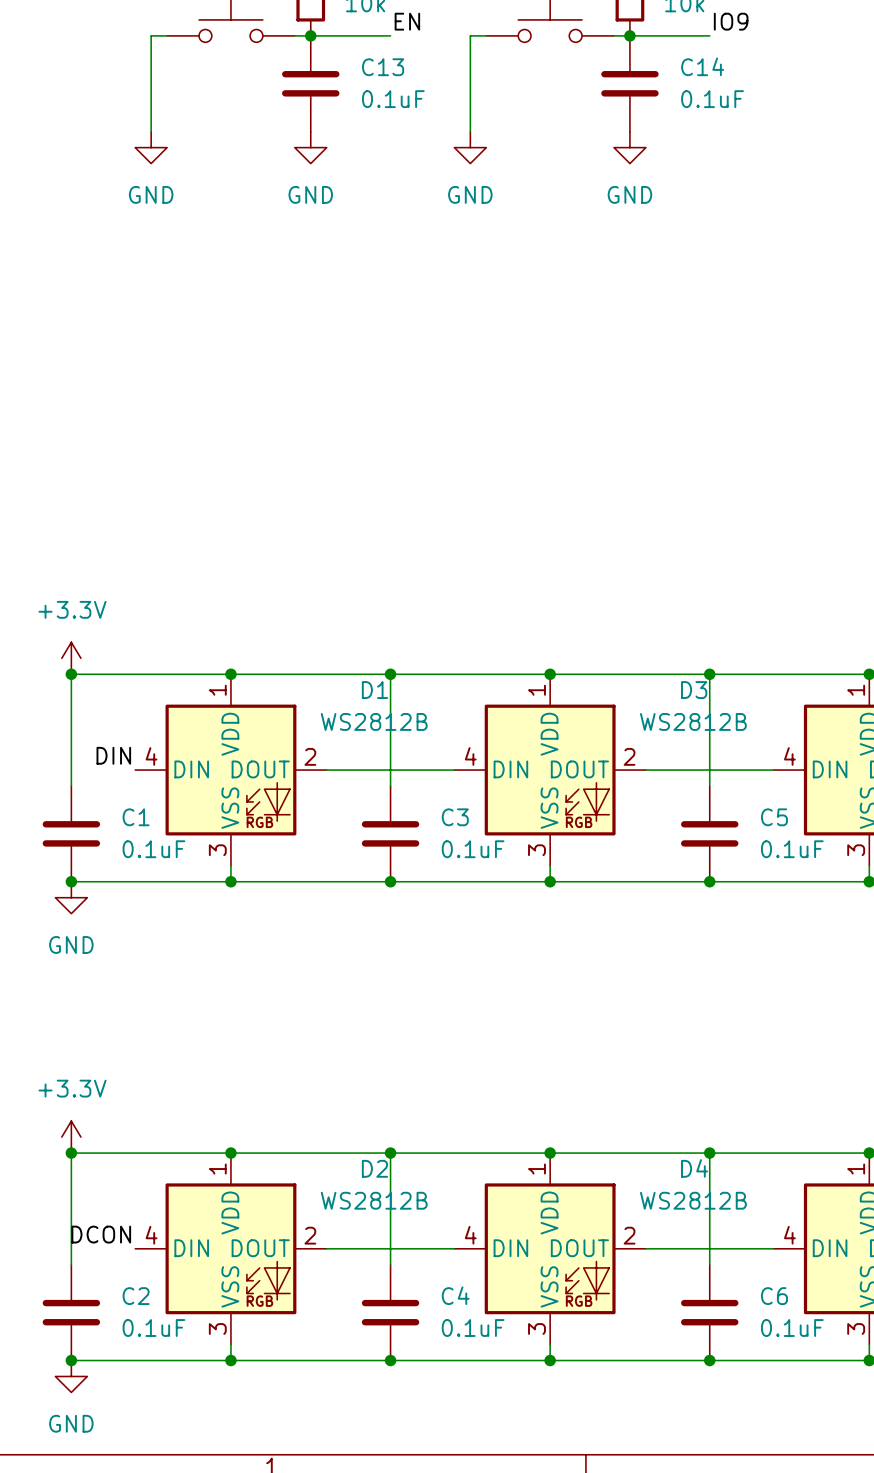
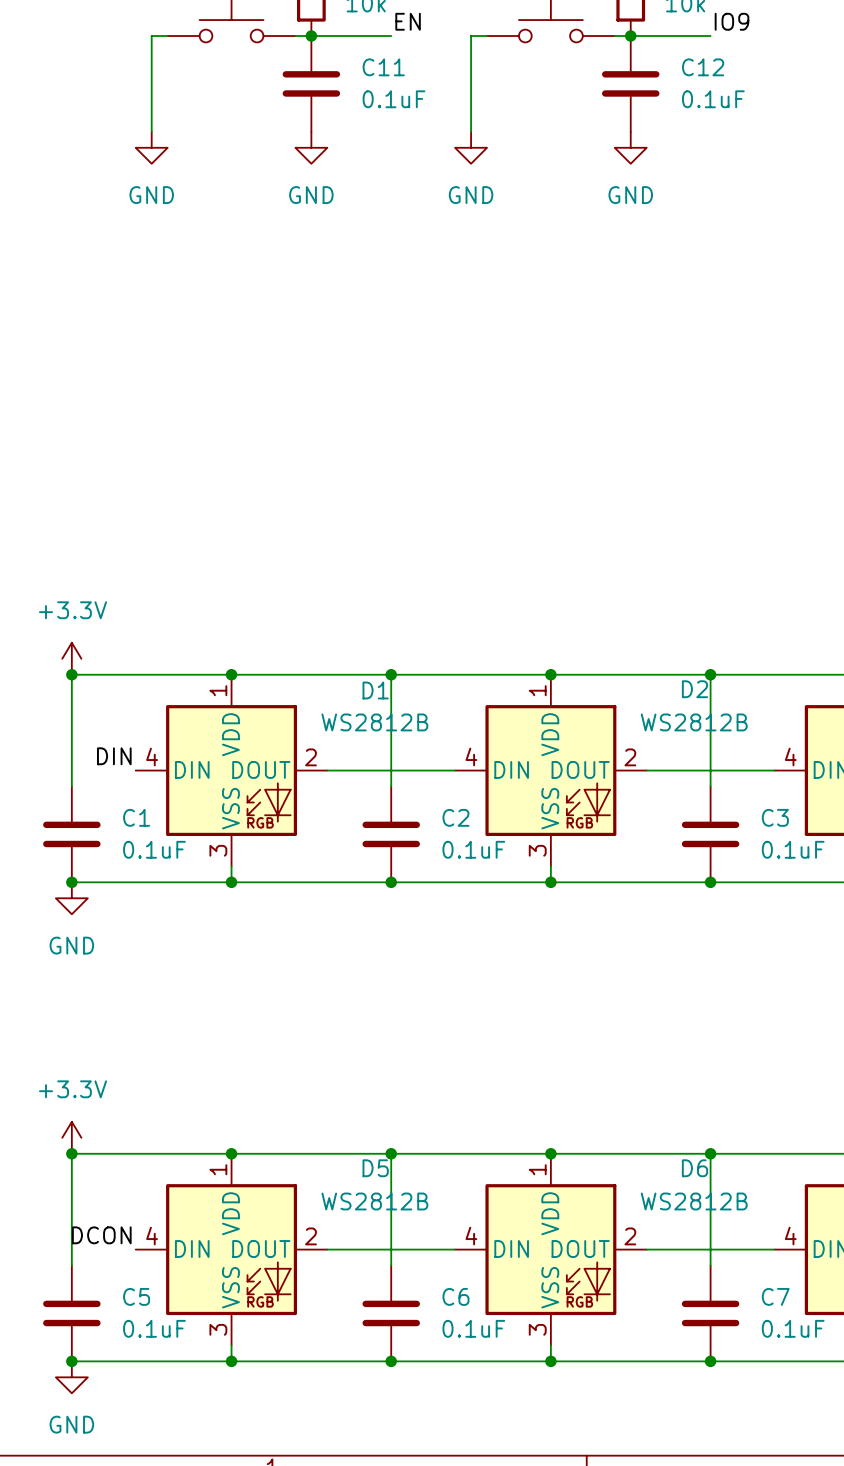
C14 name: C14 (702, 66) -> C12 (703, 67)
C13 name: C13 (383, 67) -> C11 (383, 67)
D3 name: D3 (694, 690) -> D2 (694, 689)
C3 name: C3 (455, 817) -> C2 (455, 817)
C5 name: C5 (774, 817) -> C3 (775, 817)
D2 name: D2 (374, 1168) -> D5 (375, 1168)
D4 name: D4 (694, 1168) -> D6 (694, 1168)
C4 name: C4 (455, 1295) -> C6 (455, 1296)
C2 name: C2 (136, 1296) -> C5 (136, 1296)
C6 name: C6 (774, 1296) -> C7 (775, 1296)

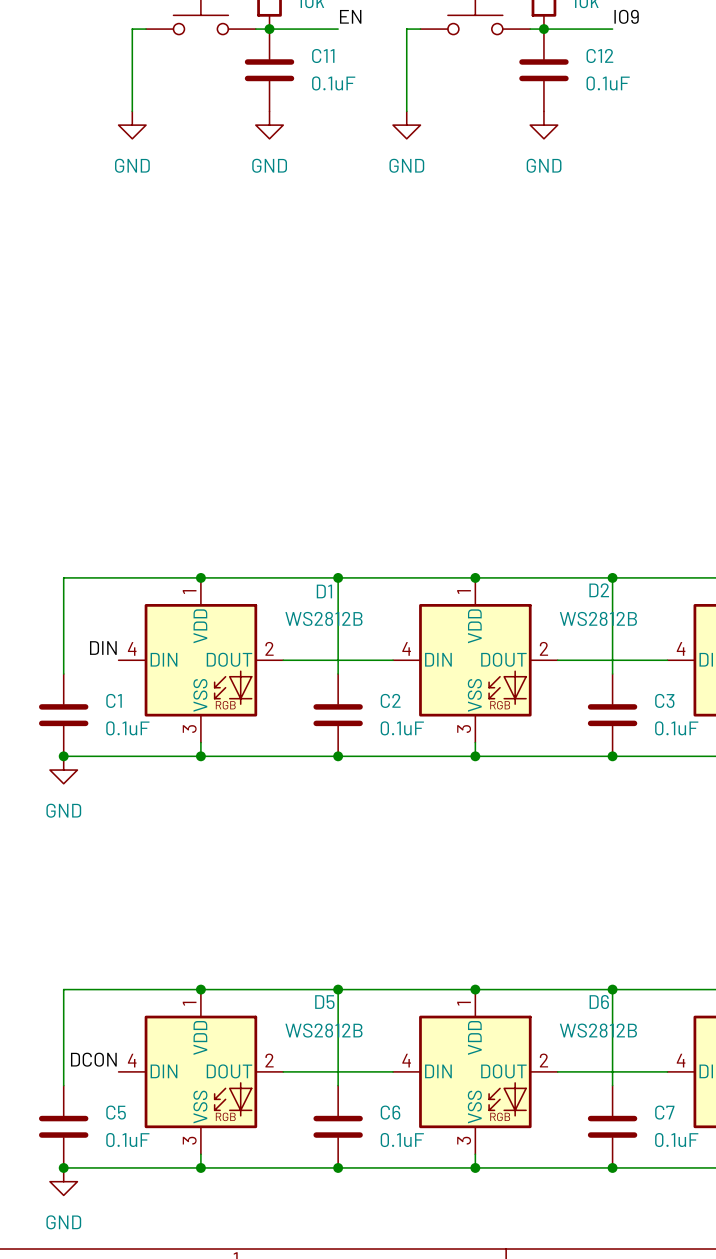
power symbol: +3.3V (71, 658) -> none
junction: (71, 674) -> none
power symbol: +3.3V (71, 1137) -> none
junction: (71, 1153) -> none

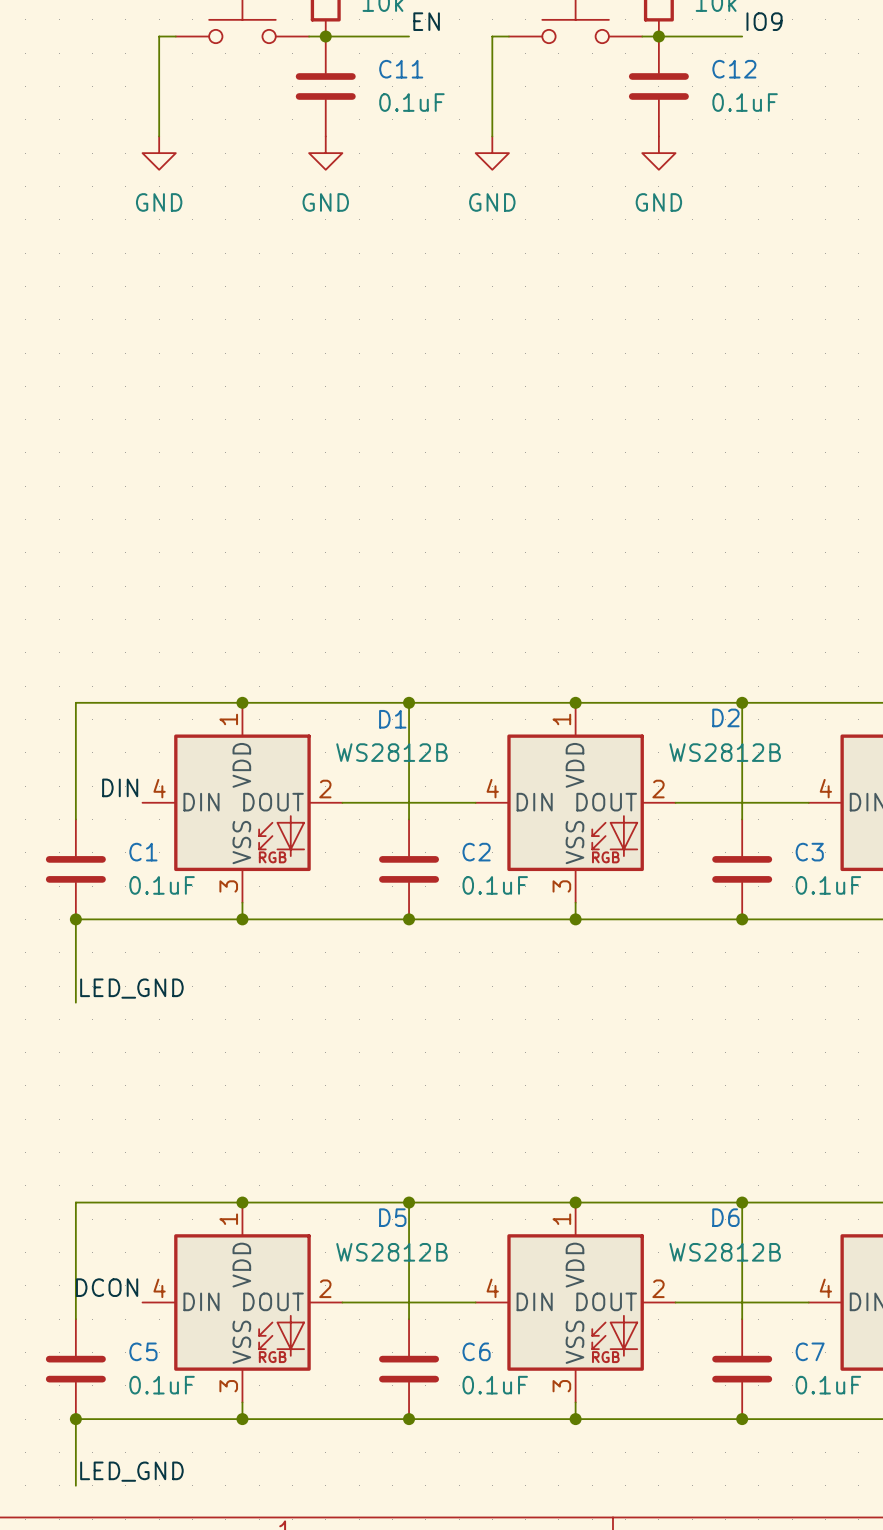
wire: none -> (75, 919) (75, 1002)
power symbol: GND (63, 770) -> none
label: none -> LED_GND (131, 988)
wire: none -> (75, 1419) (75, 1485)
power symbol: GND (63, 1181) -> none
label: none -> LED_GND (131, 1471)

